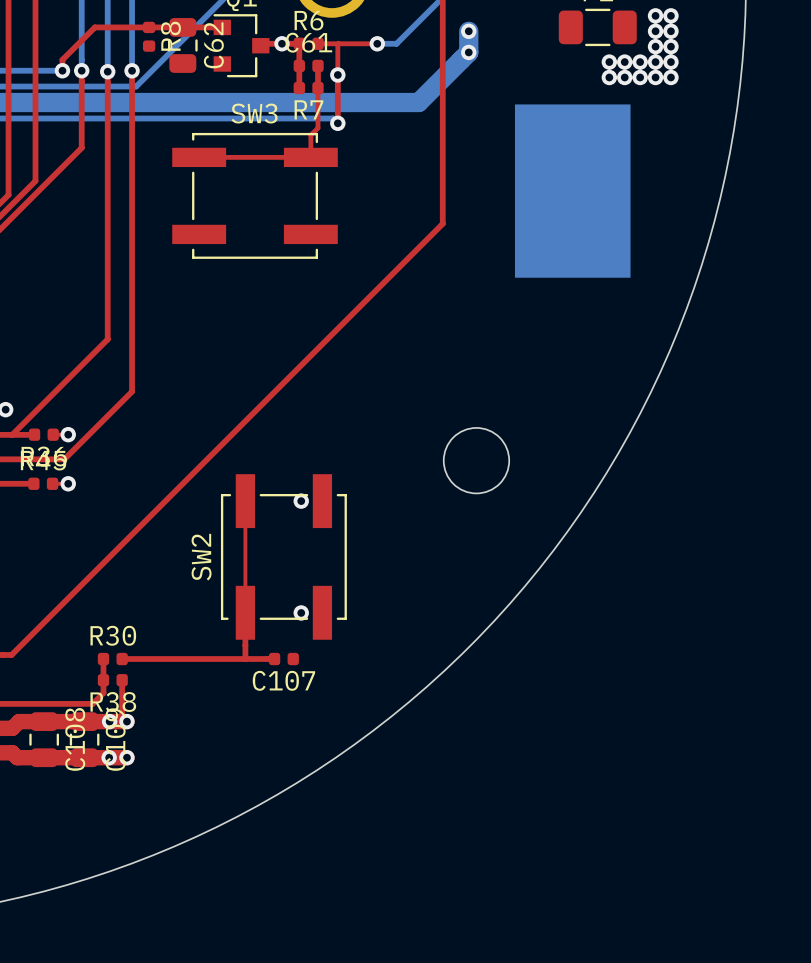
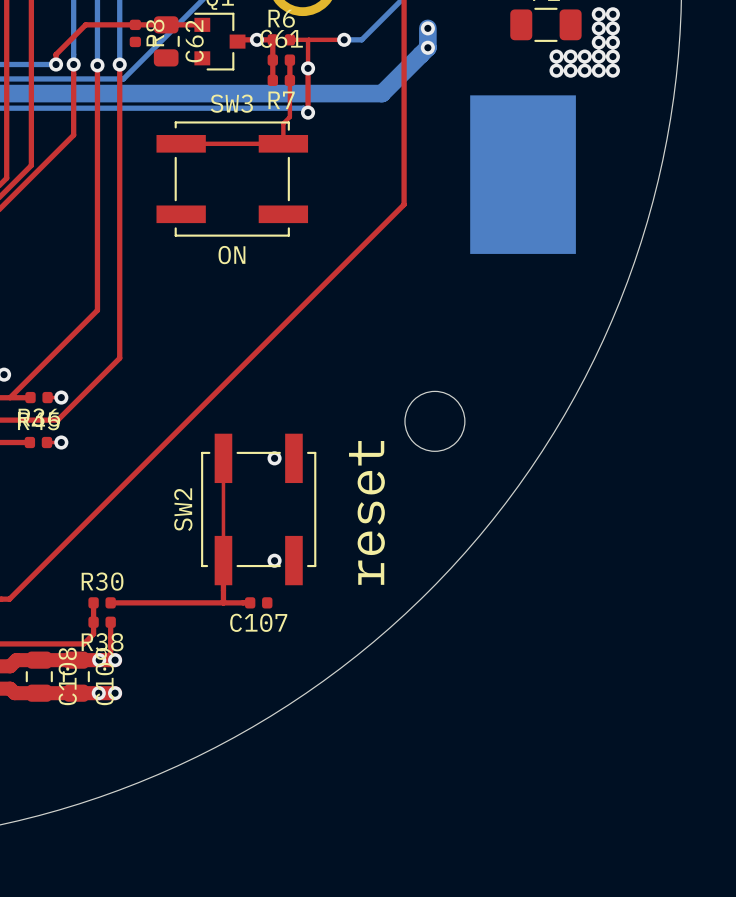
text: none -> ON (231, 255)
text: none -> reset (366, 512)

